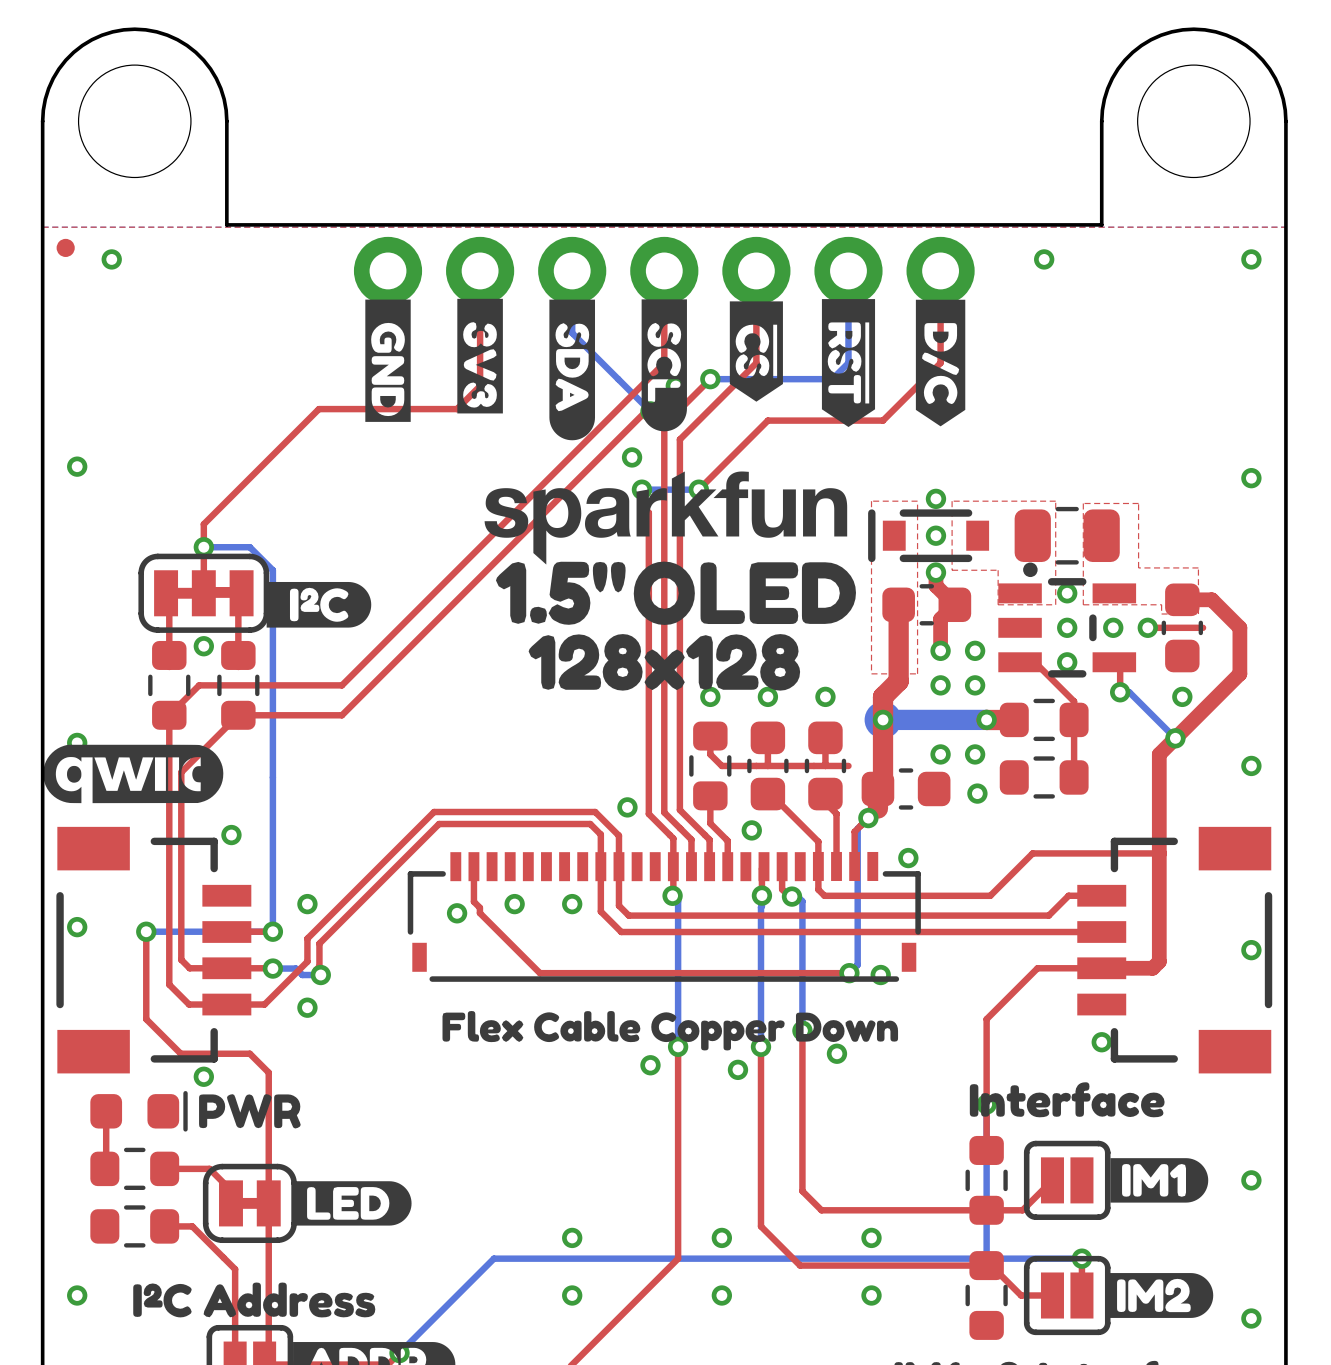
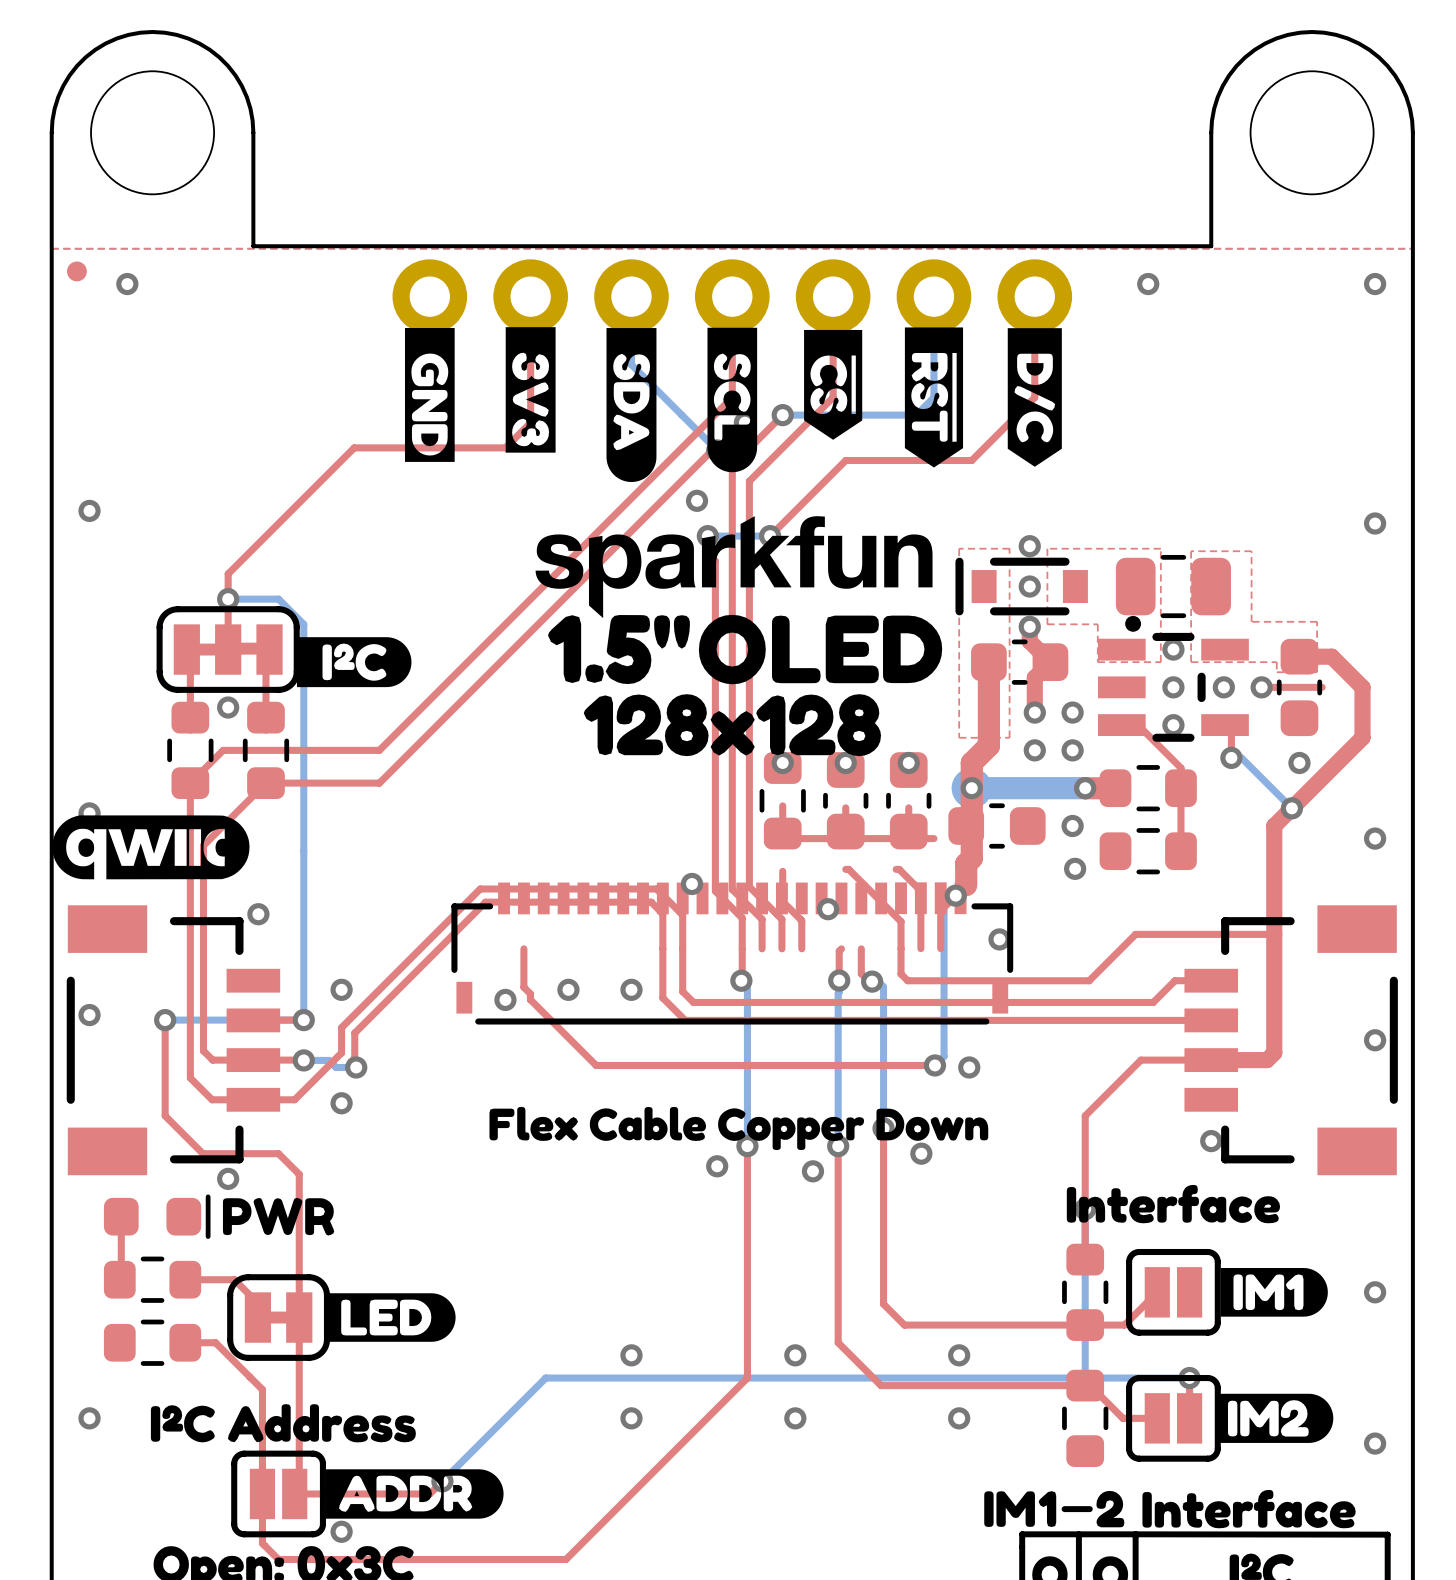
part: none -> (845, 800)
part: none -> (908, 800)
via: (940, 754) -> none
part position: (710, 765) -> (782, 800)
part: (767, 765) -> none
part: (825, 765) -> none
part position: (906, 788) -> (996, 825)
part position: (664, 916) -> (732, 953)

